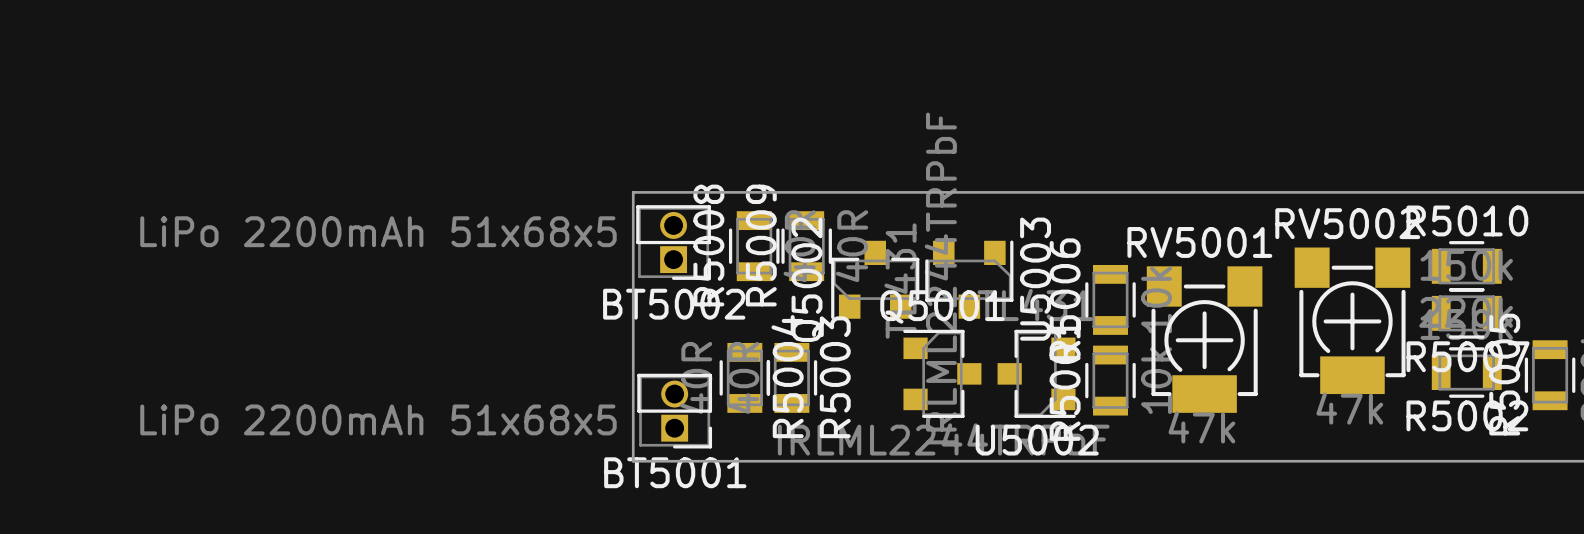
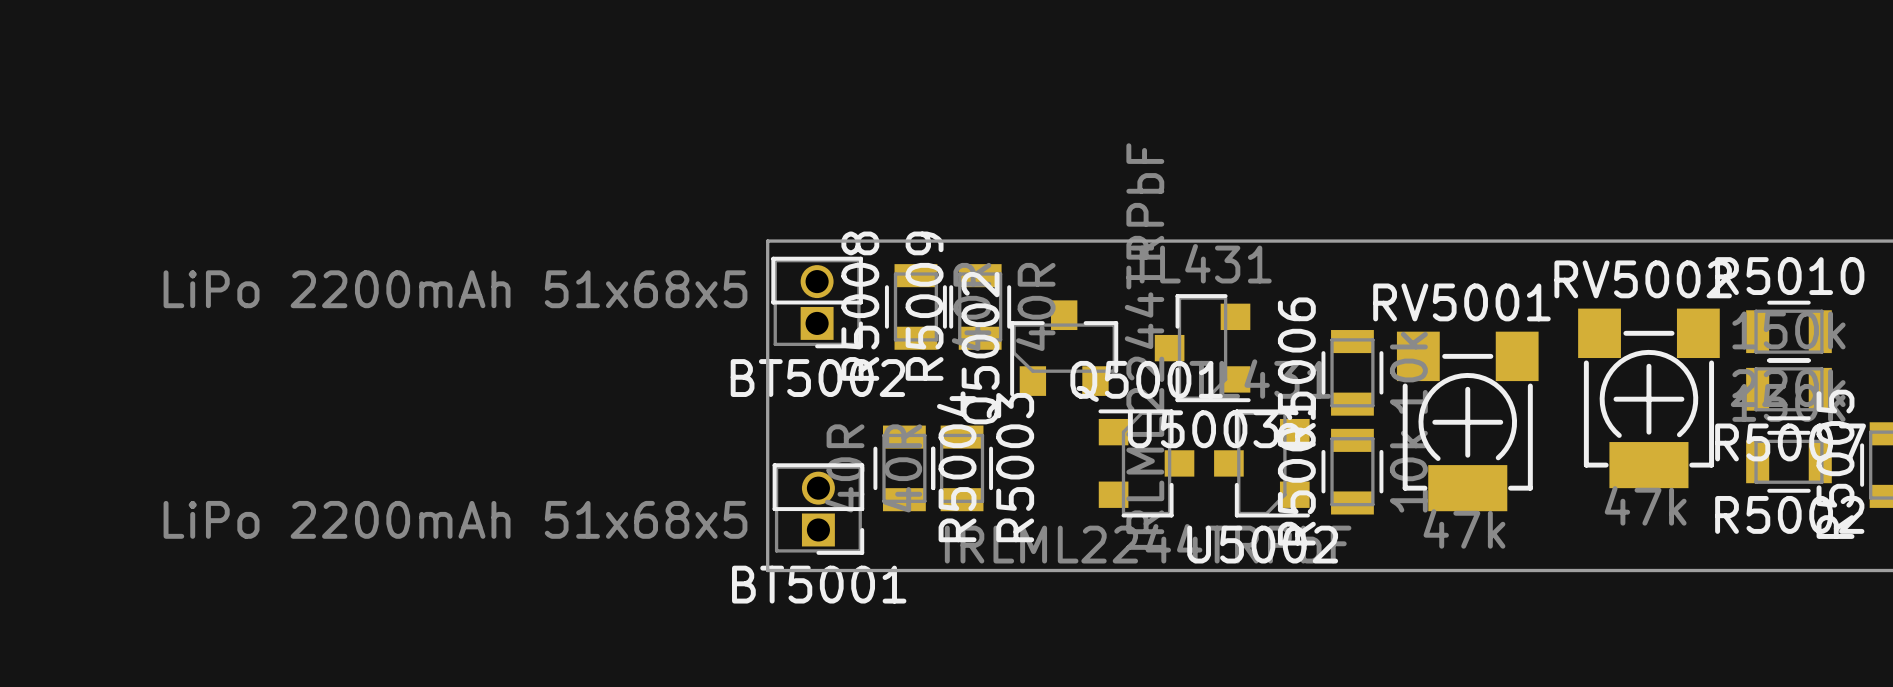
U5003 rotation: 0° (969, 279) -> 90° clockwise (1202, 348)

